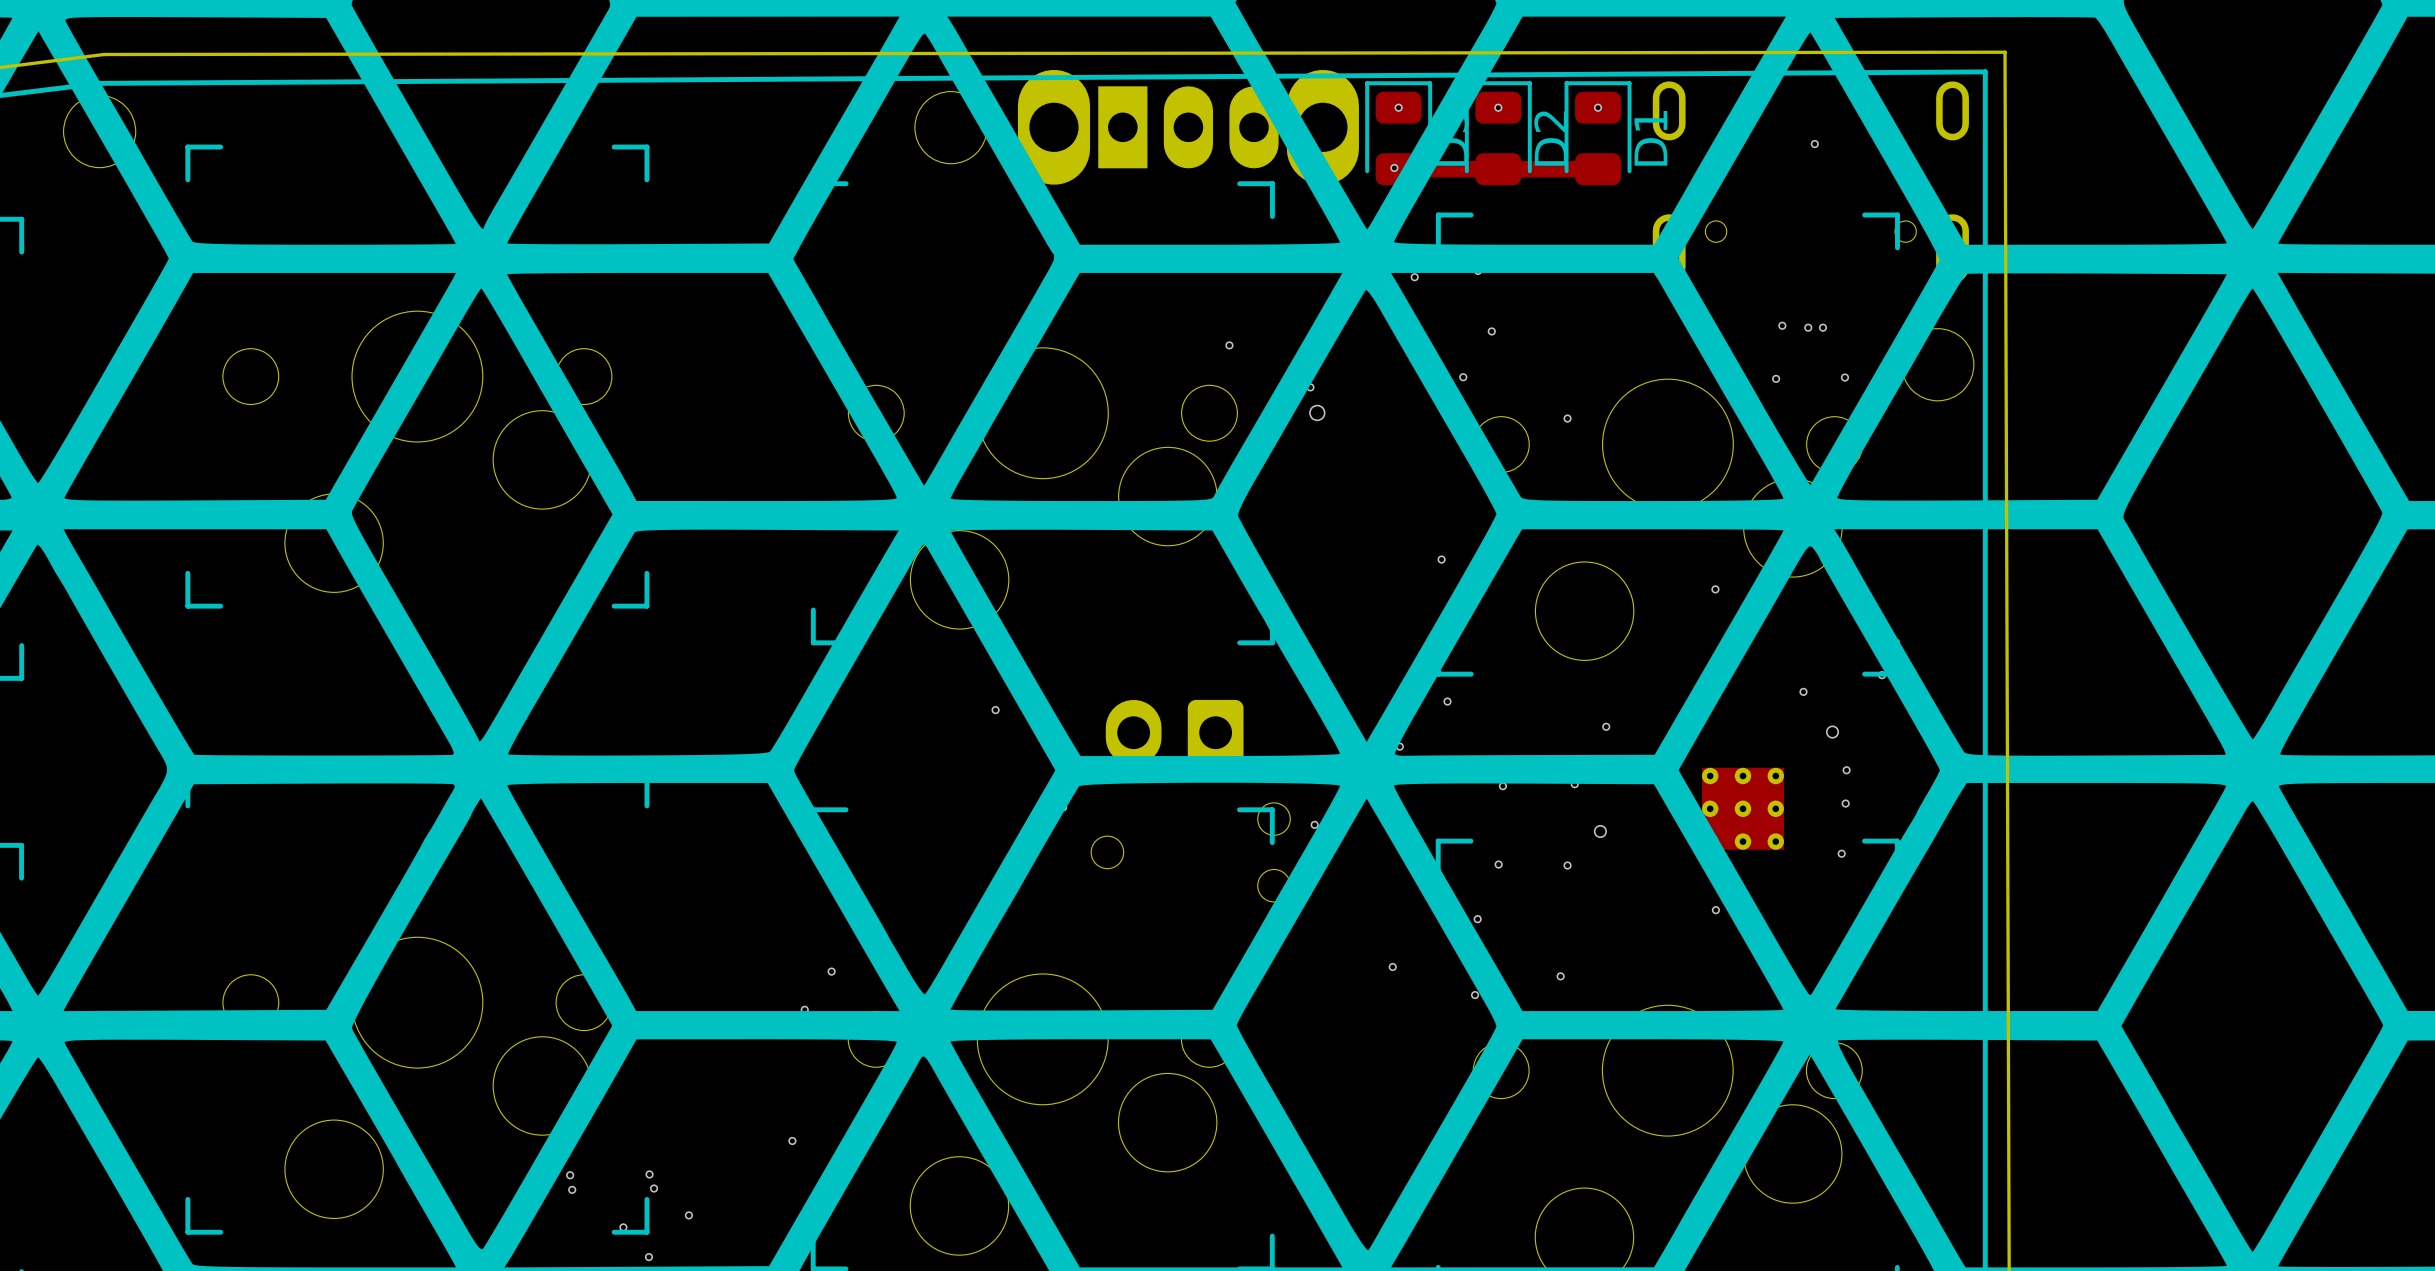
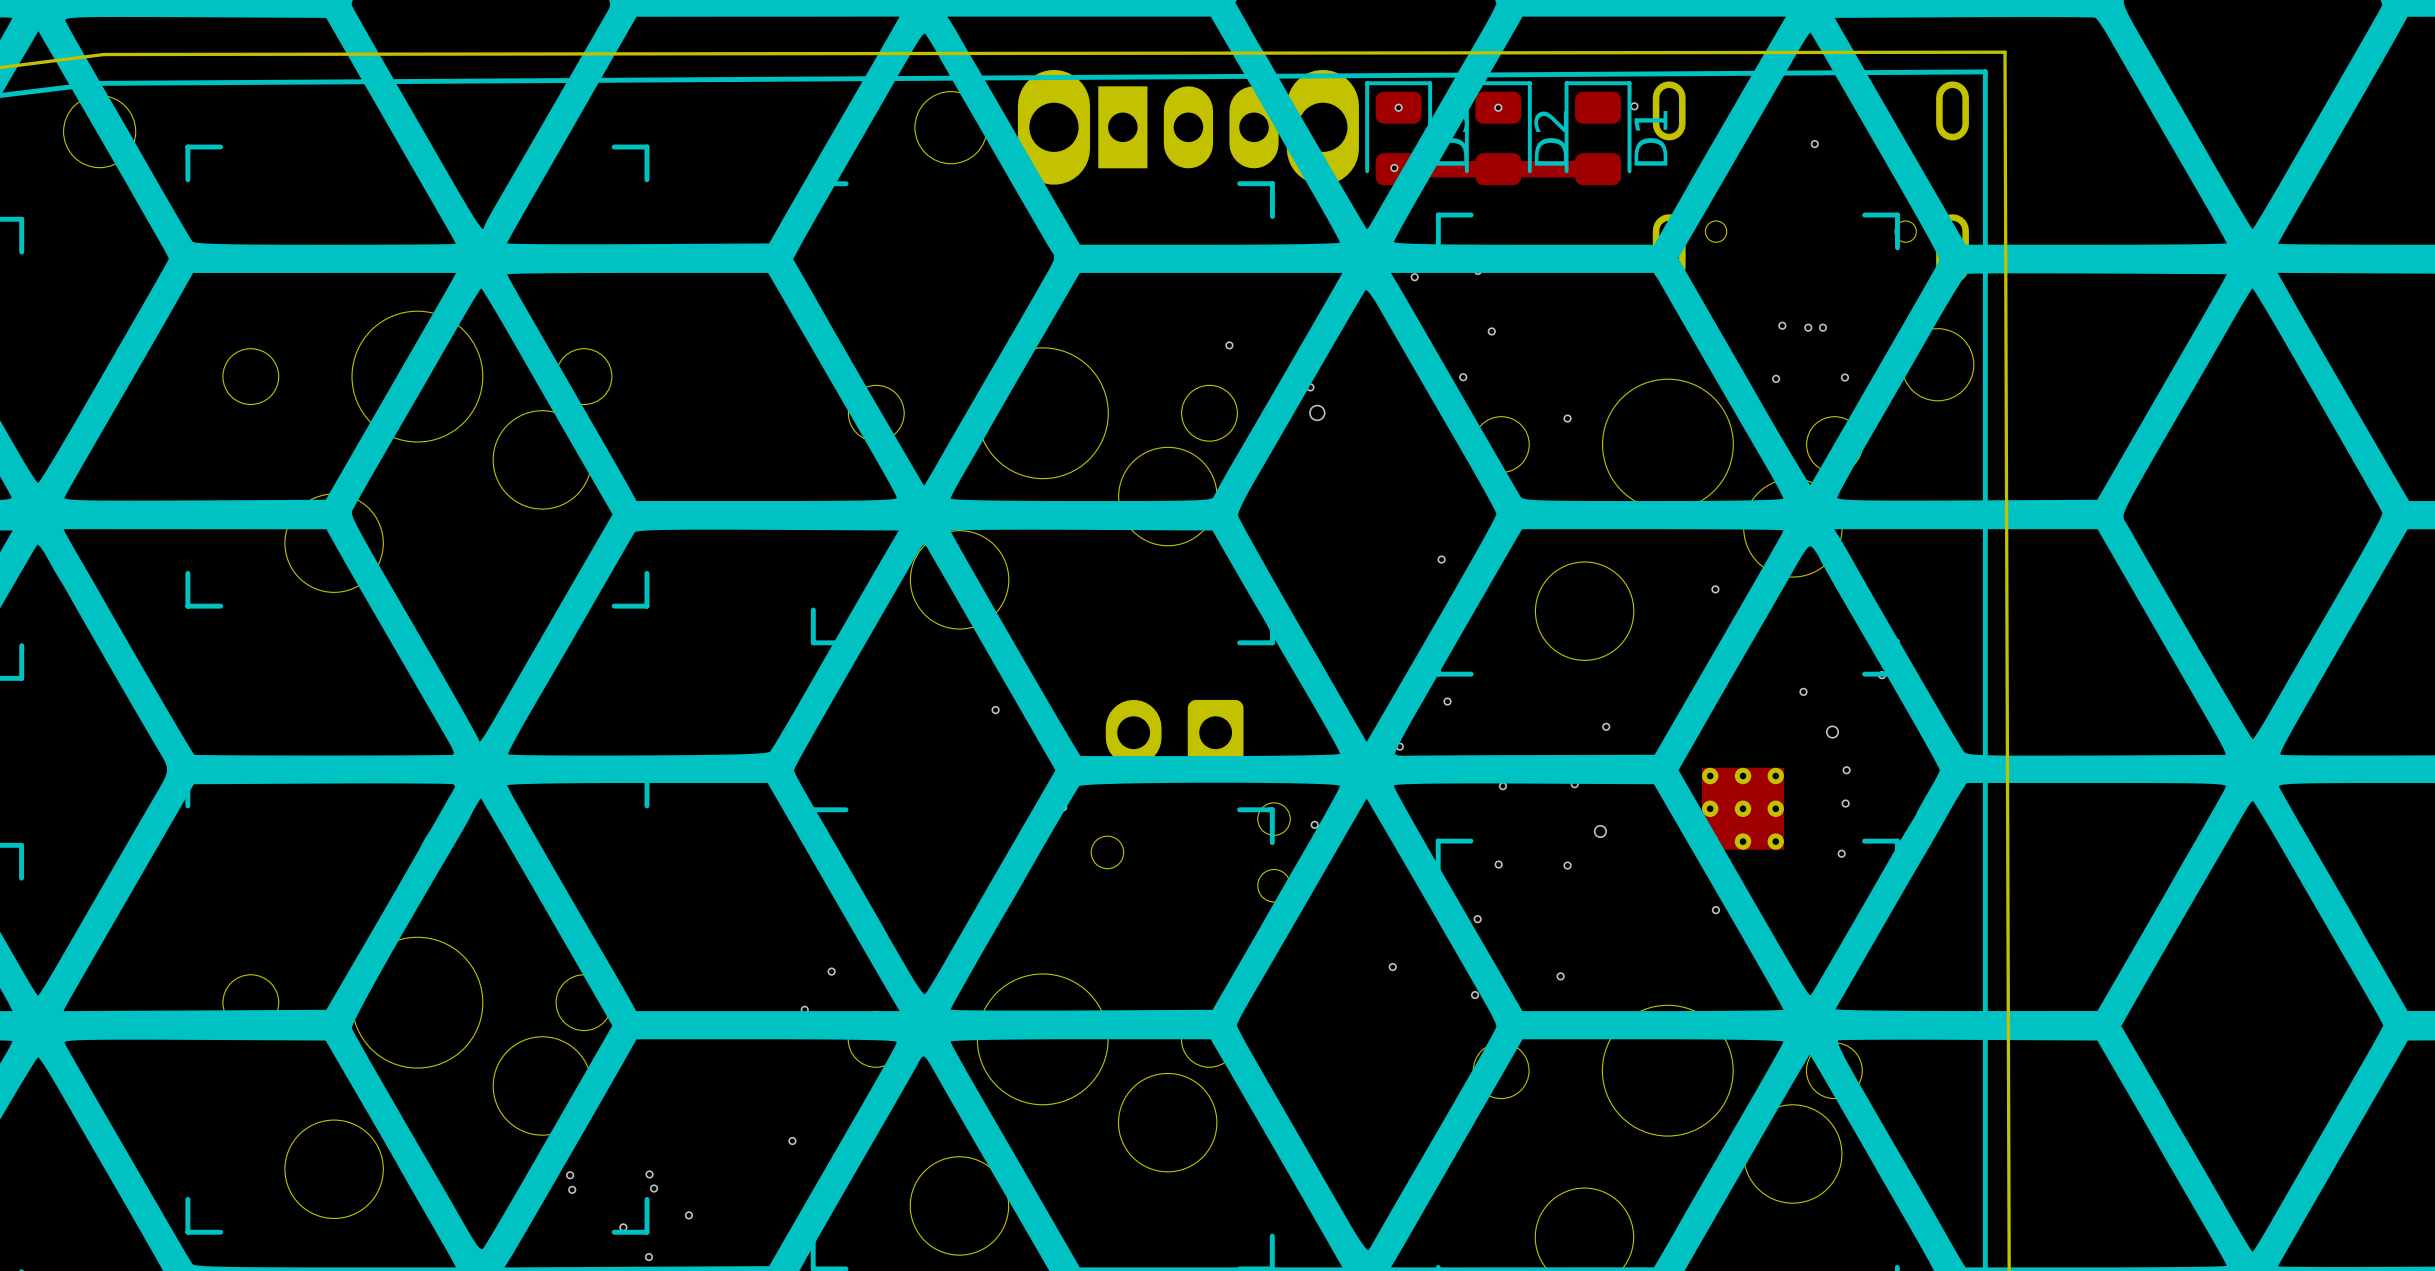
via position: (1598, 107) -> (1634, 106)

